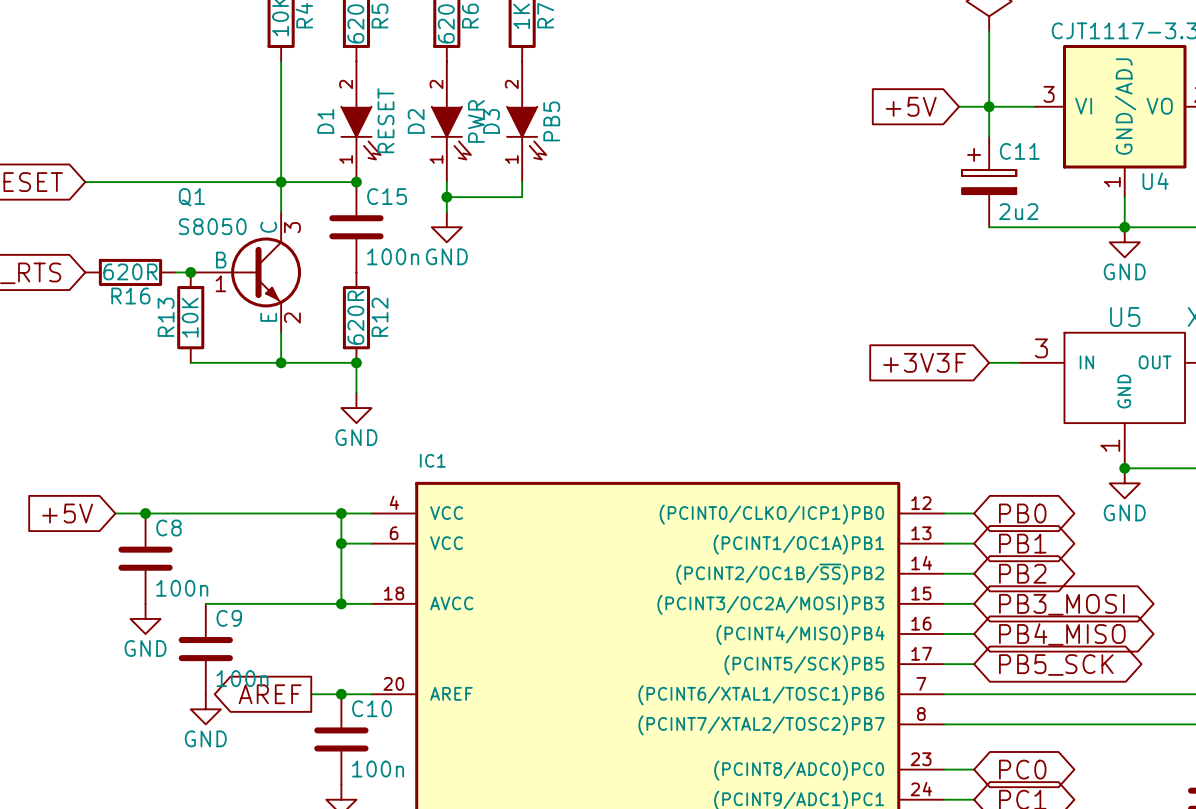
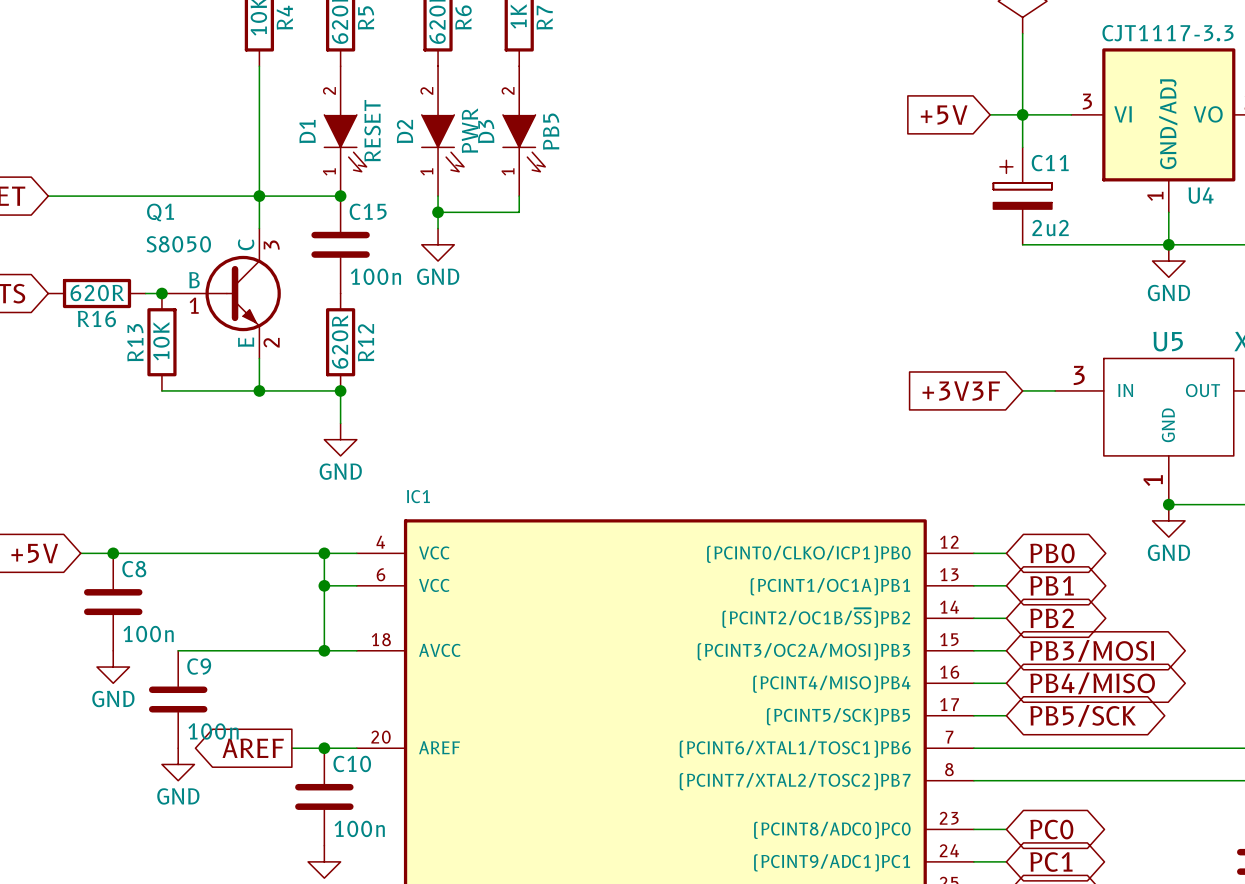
global label: PB3_MOSI (1061, 604) -> PB3/MOSI (1092, 650)
global label: PB4_MISO (1062, 634) -> PB4/MISO (1092, 683)
global label: PB5_SCK (1056, 665) -> PB5/SCK (1083, 715)

